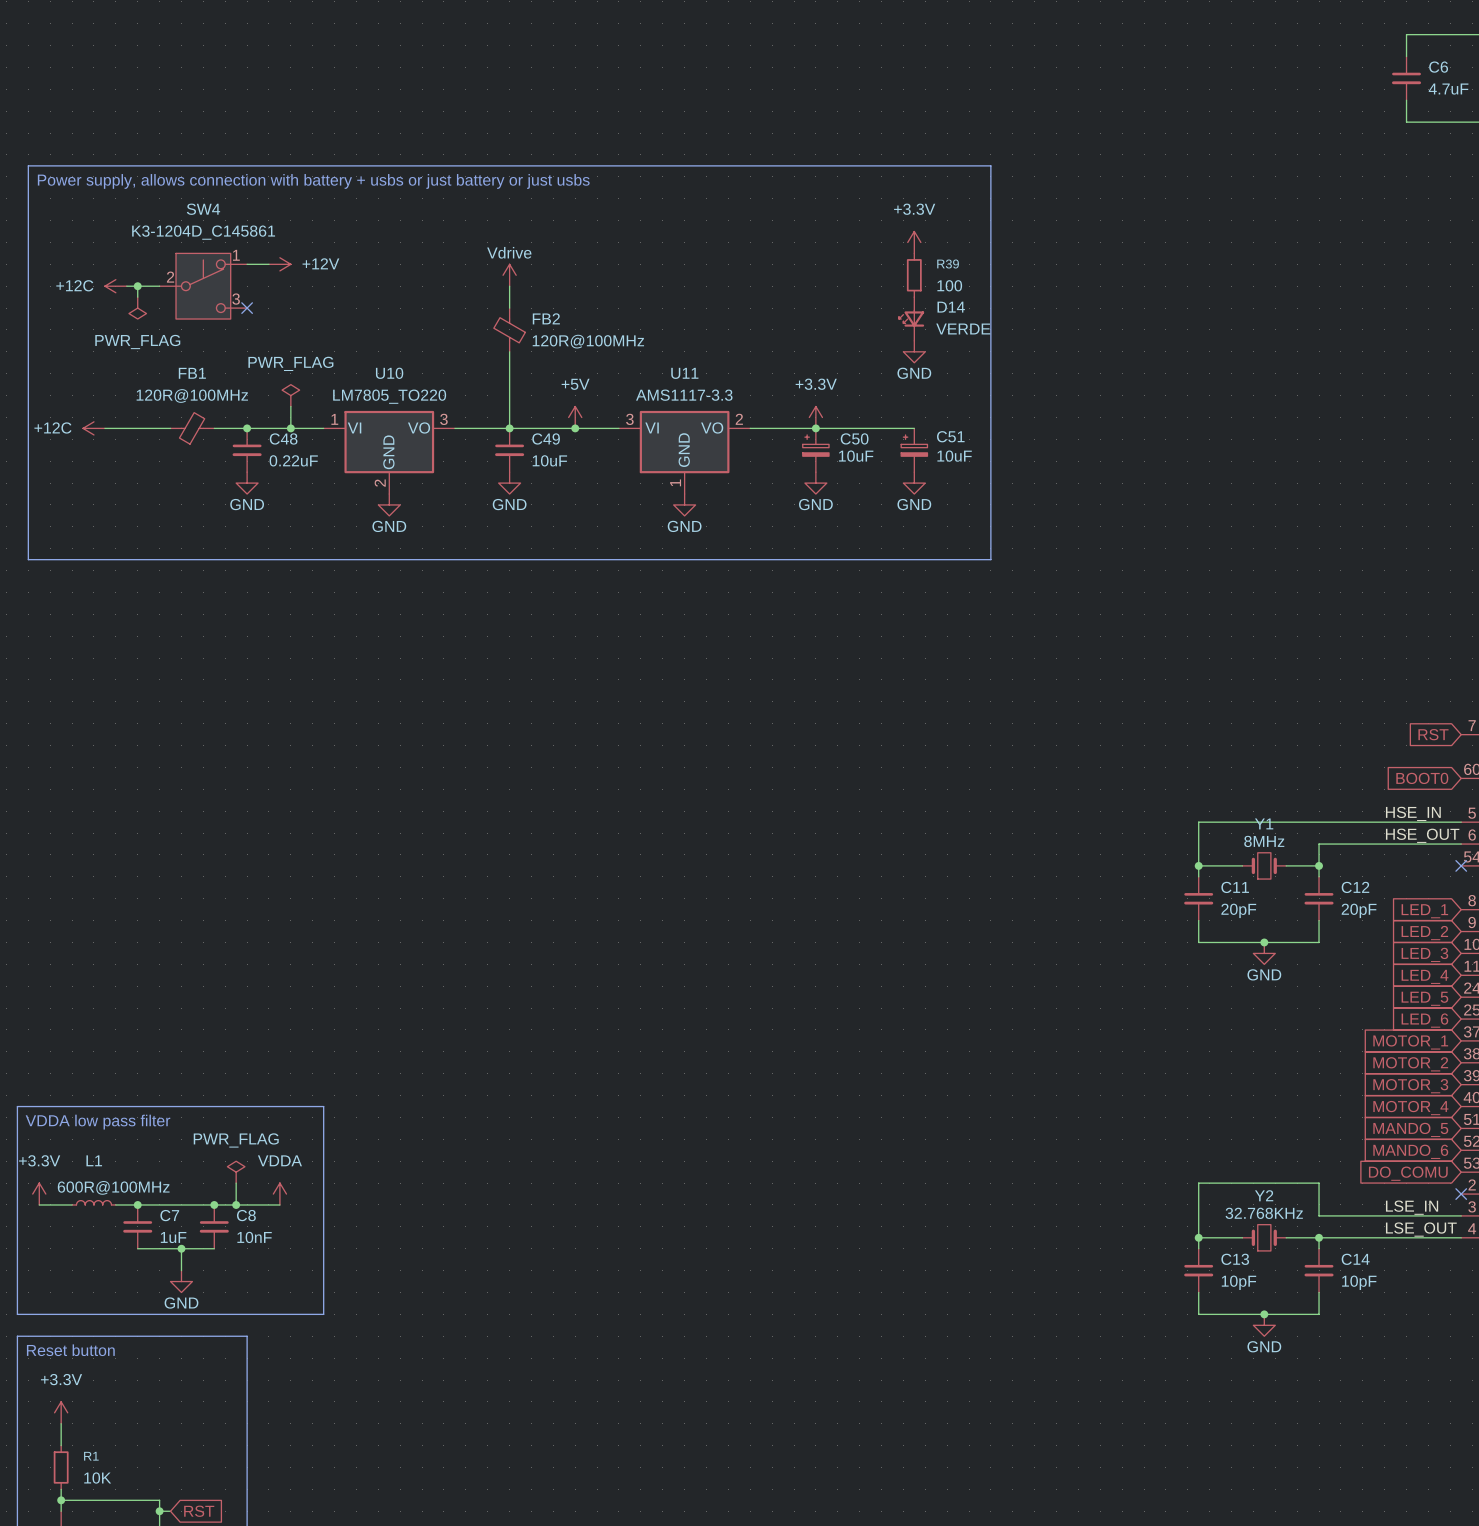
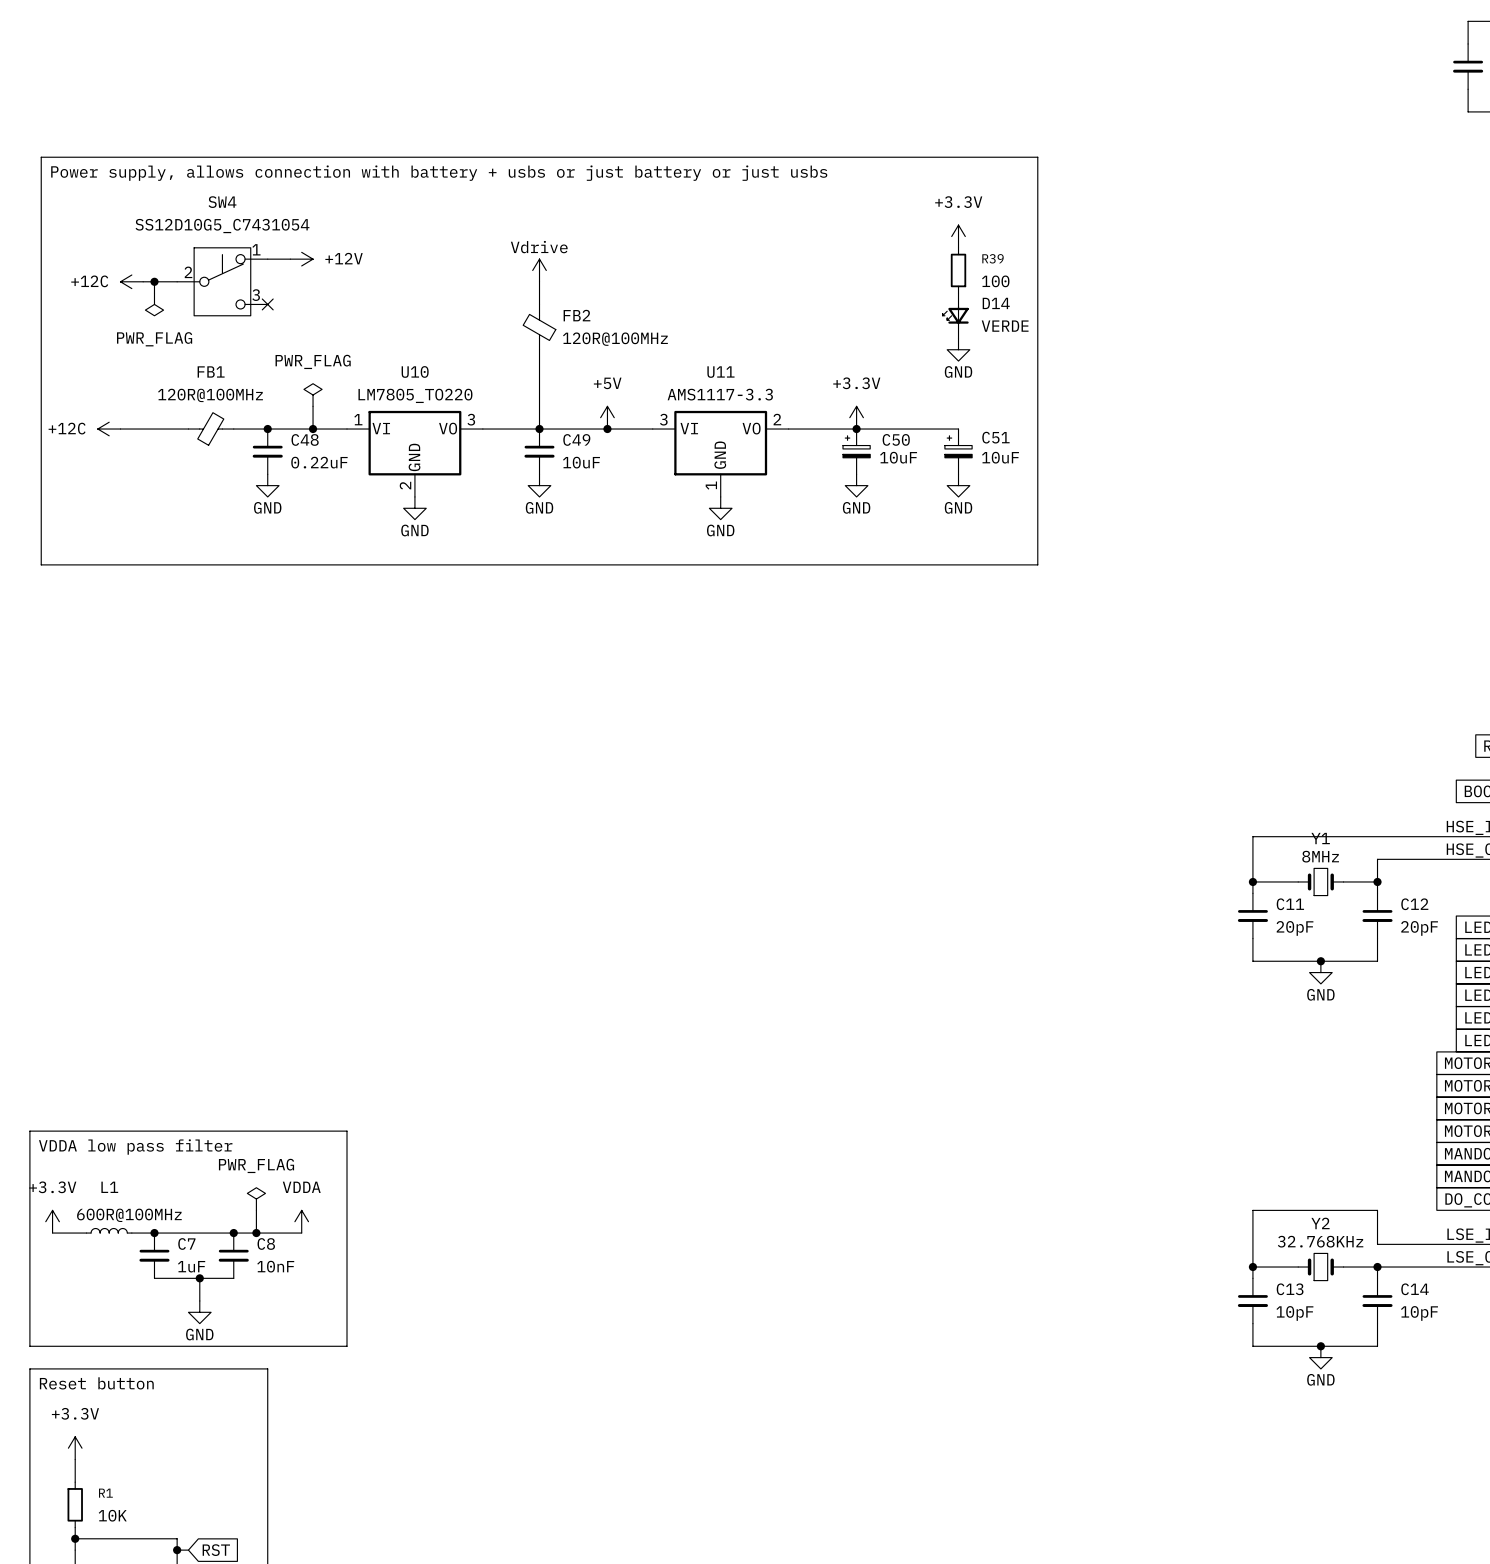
SW4 value: K3-1204D_C145861 (203, 232) -> SS12D10G5_C7431054 (222, 226)

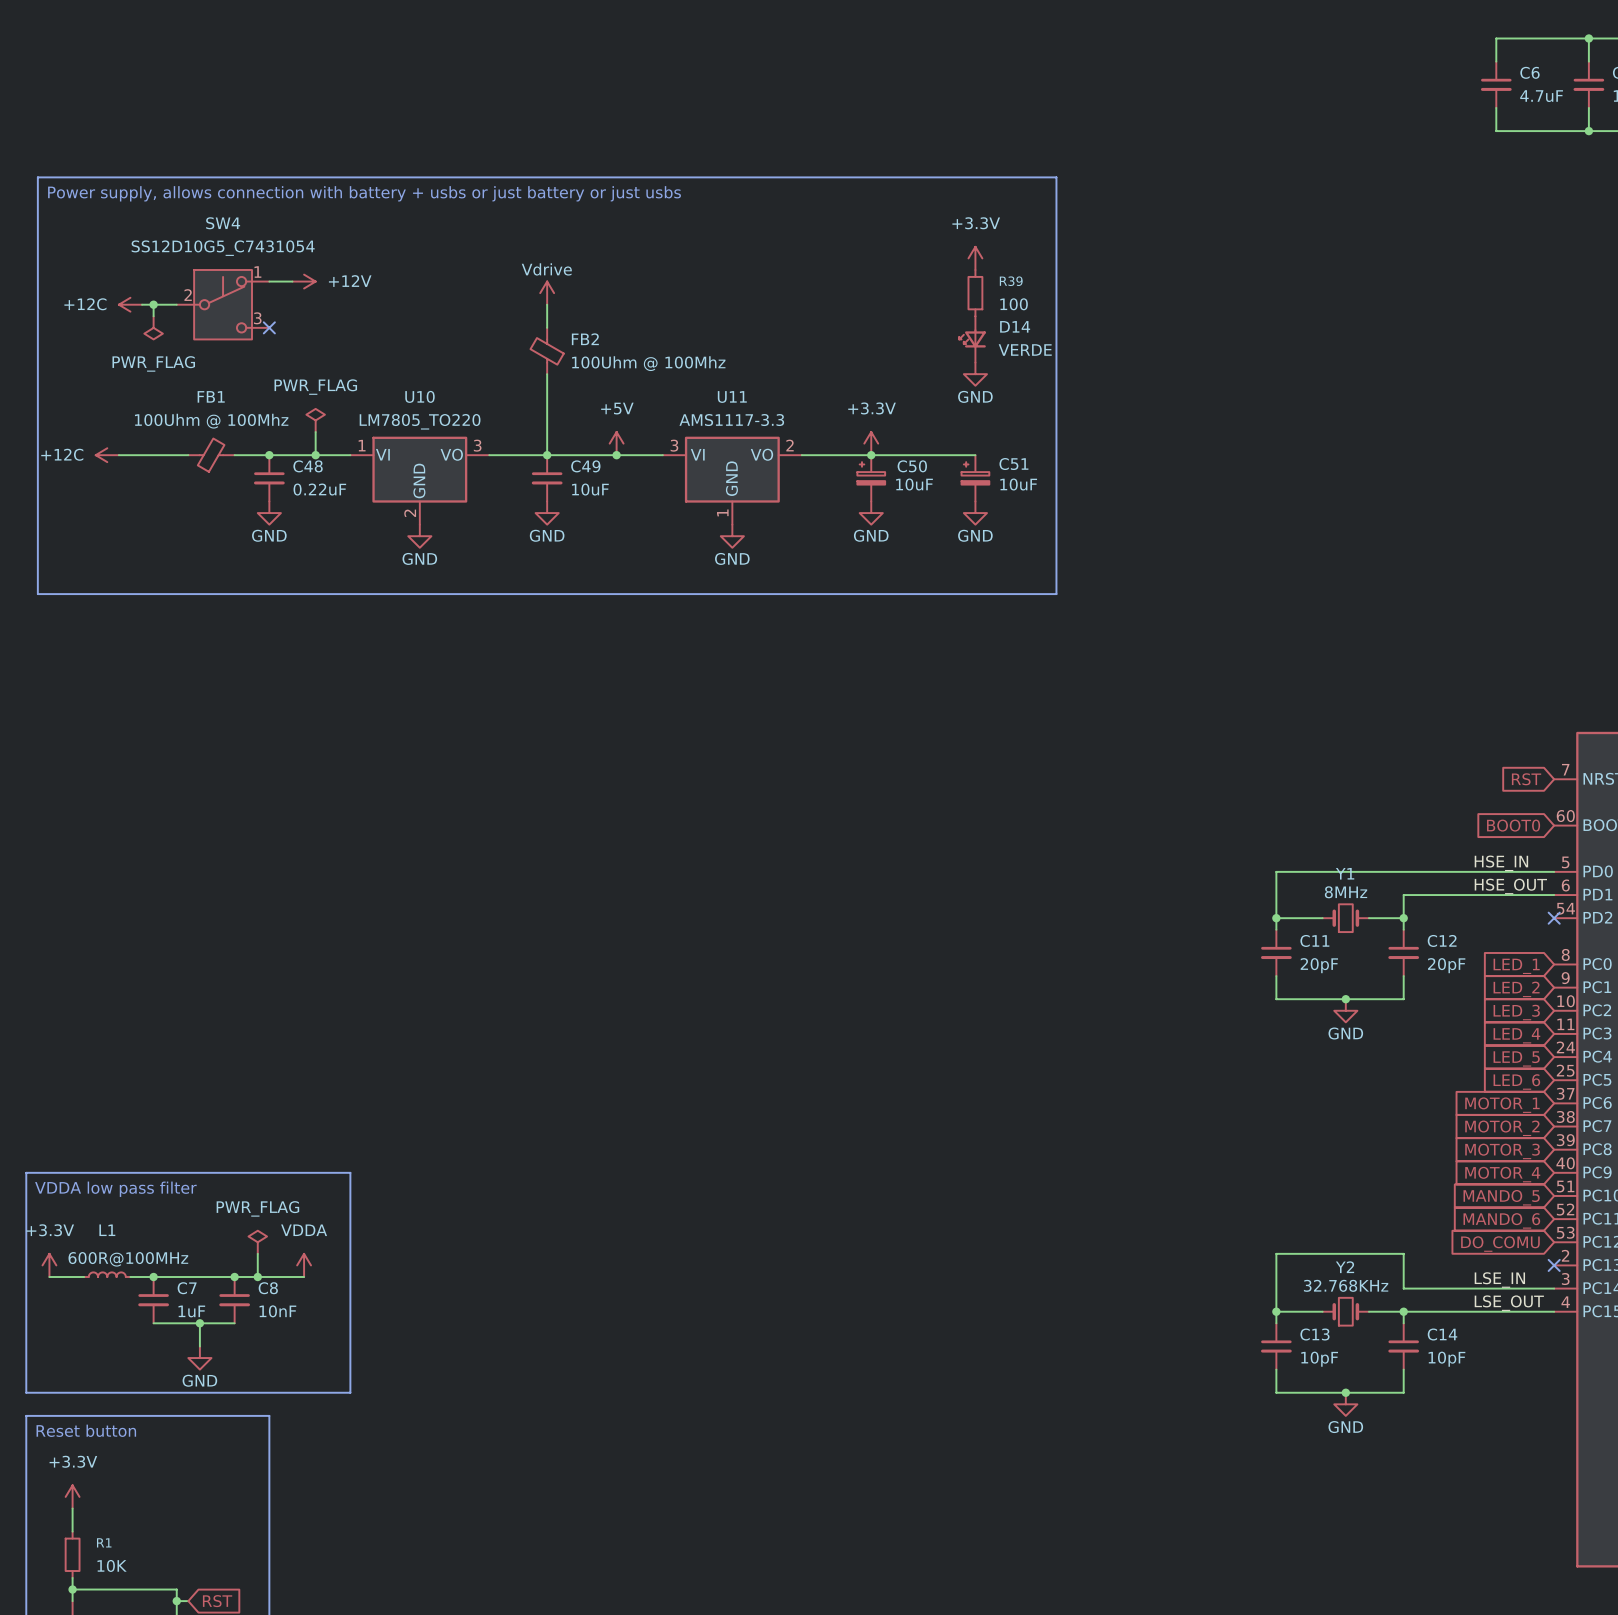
FB2 value: 120R@100MHz (615, 339) -> 100Uhm @ 100Mhz (648, 363)
FB1 value: 120R@100MHz (210, 395) -> 100Uhm @ 100Mhz (211, 421)

